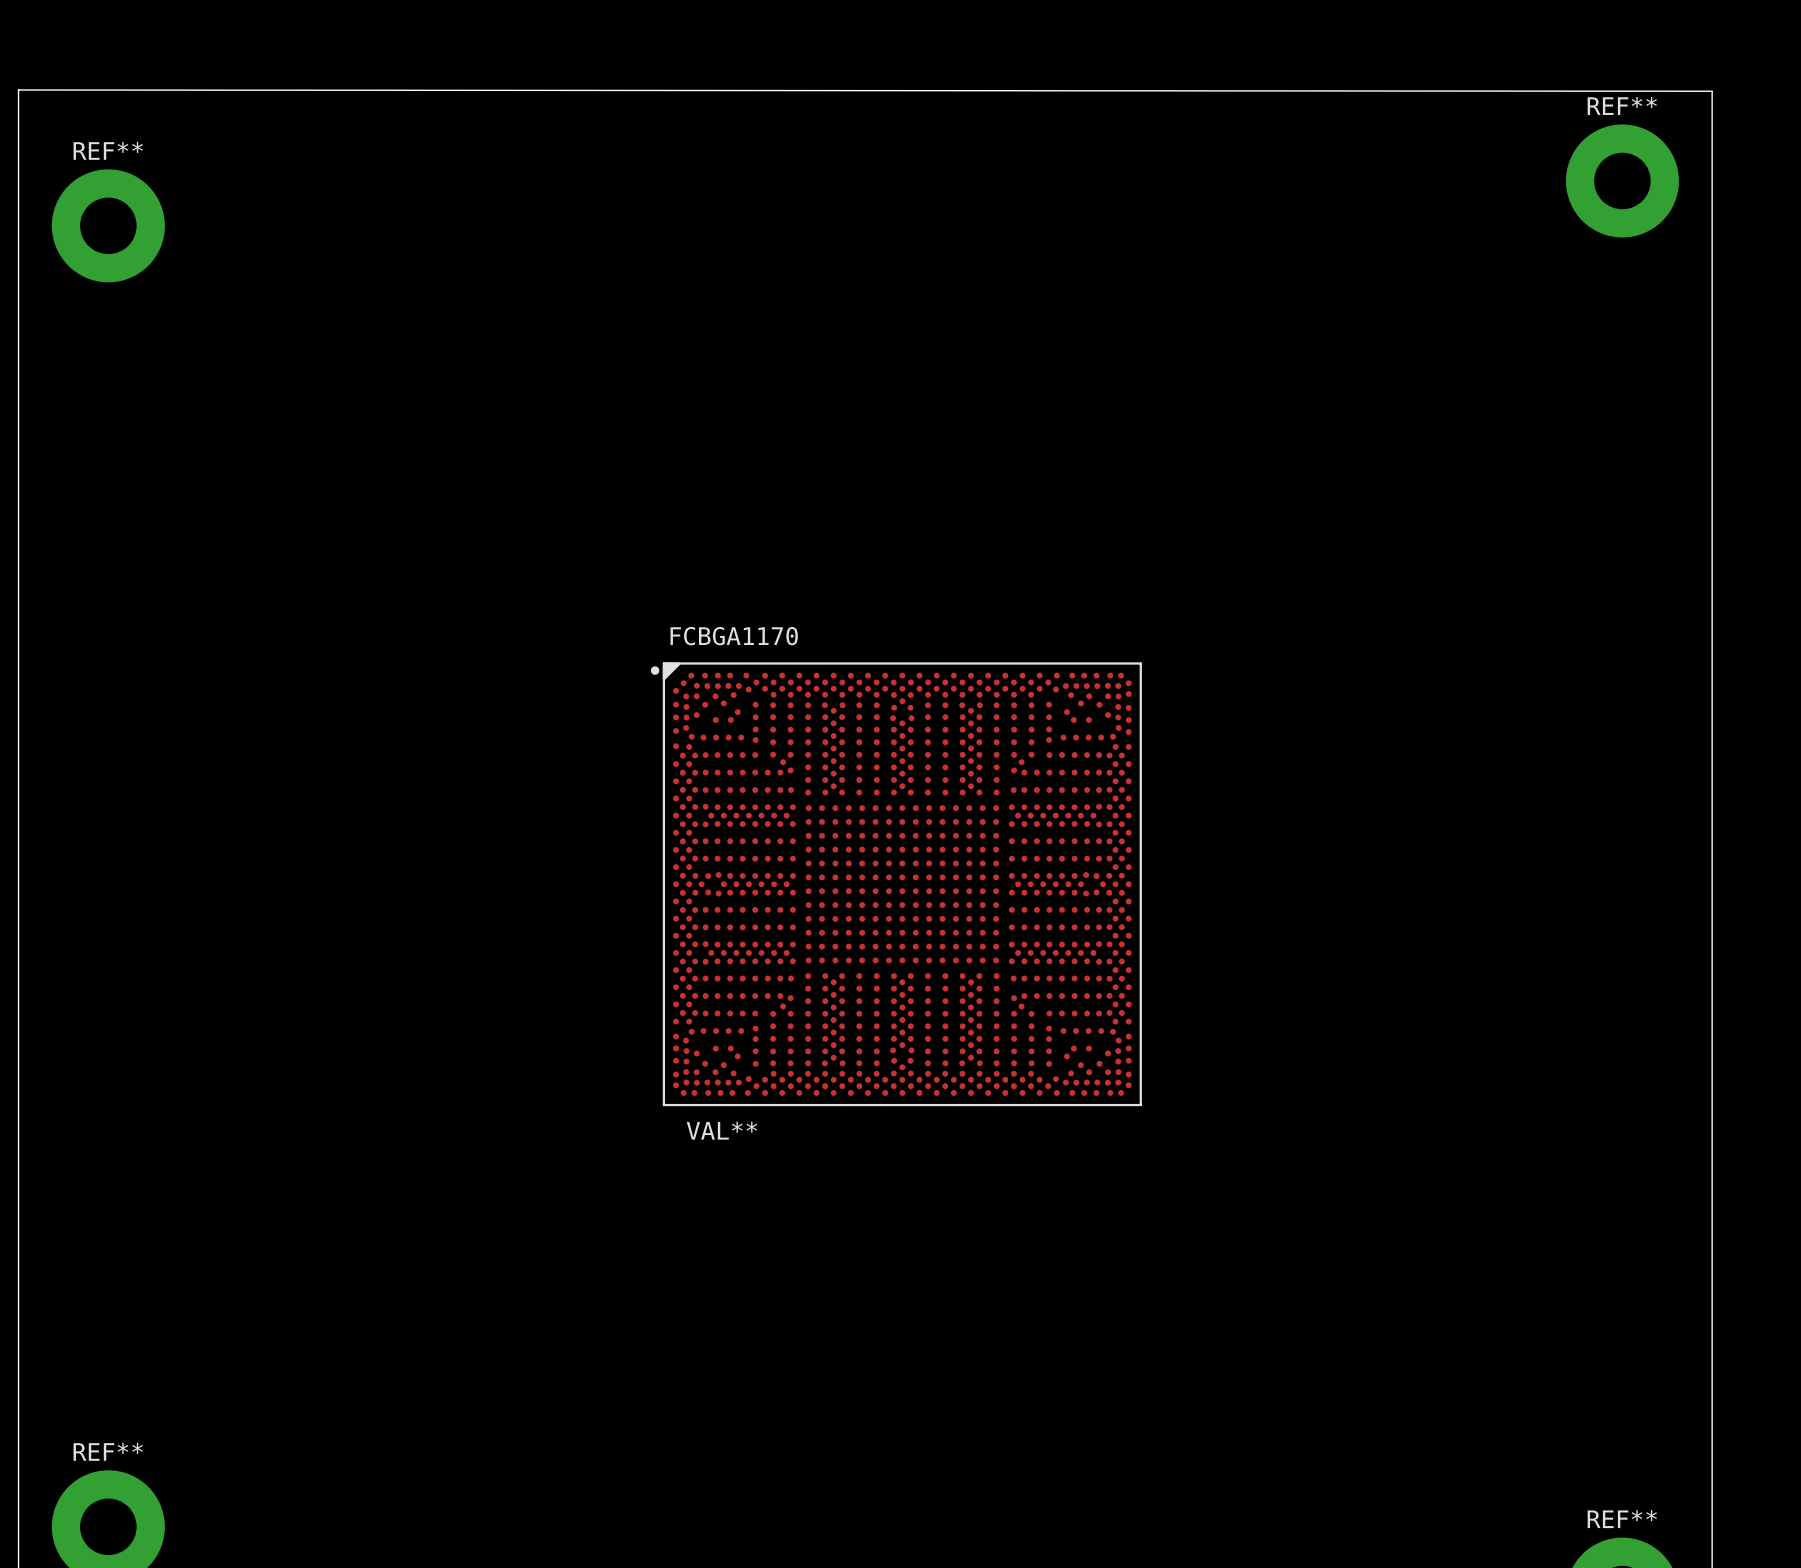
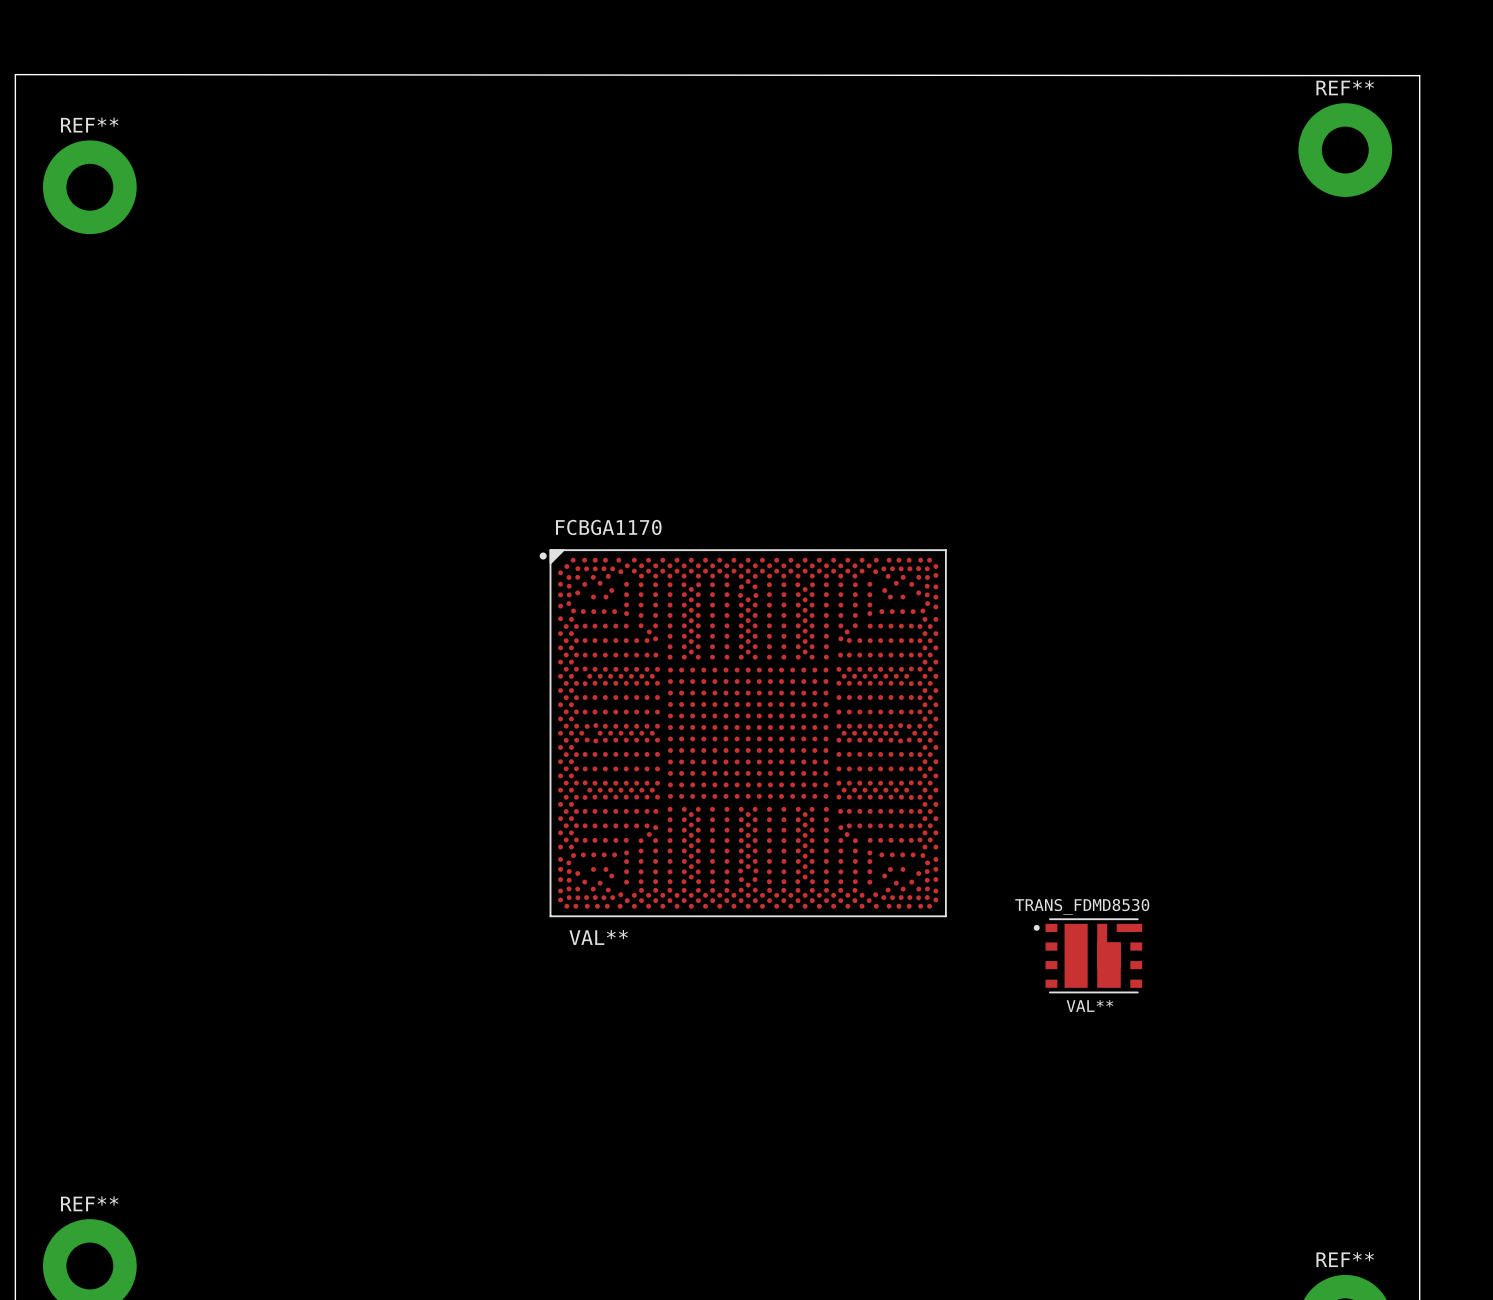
TRANS_FDMD8530: none -> VAL** (1087, 955)

